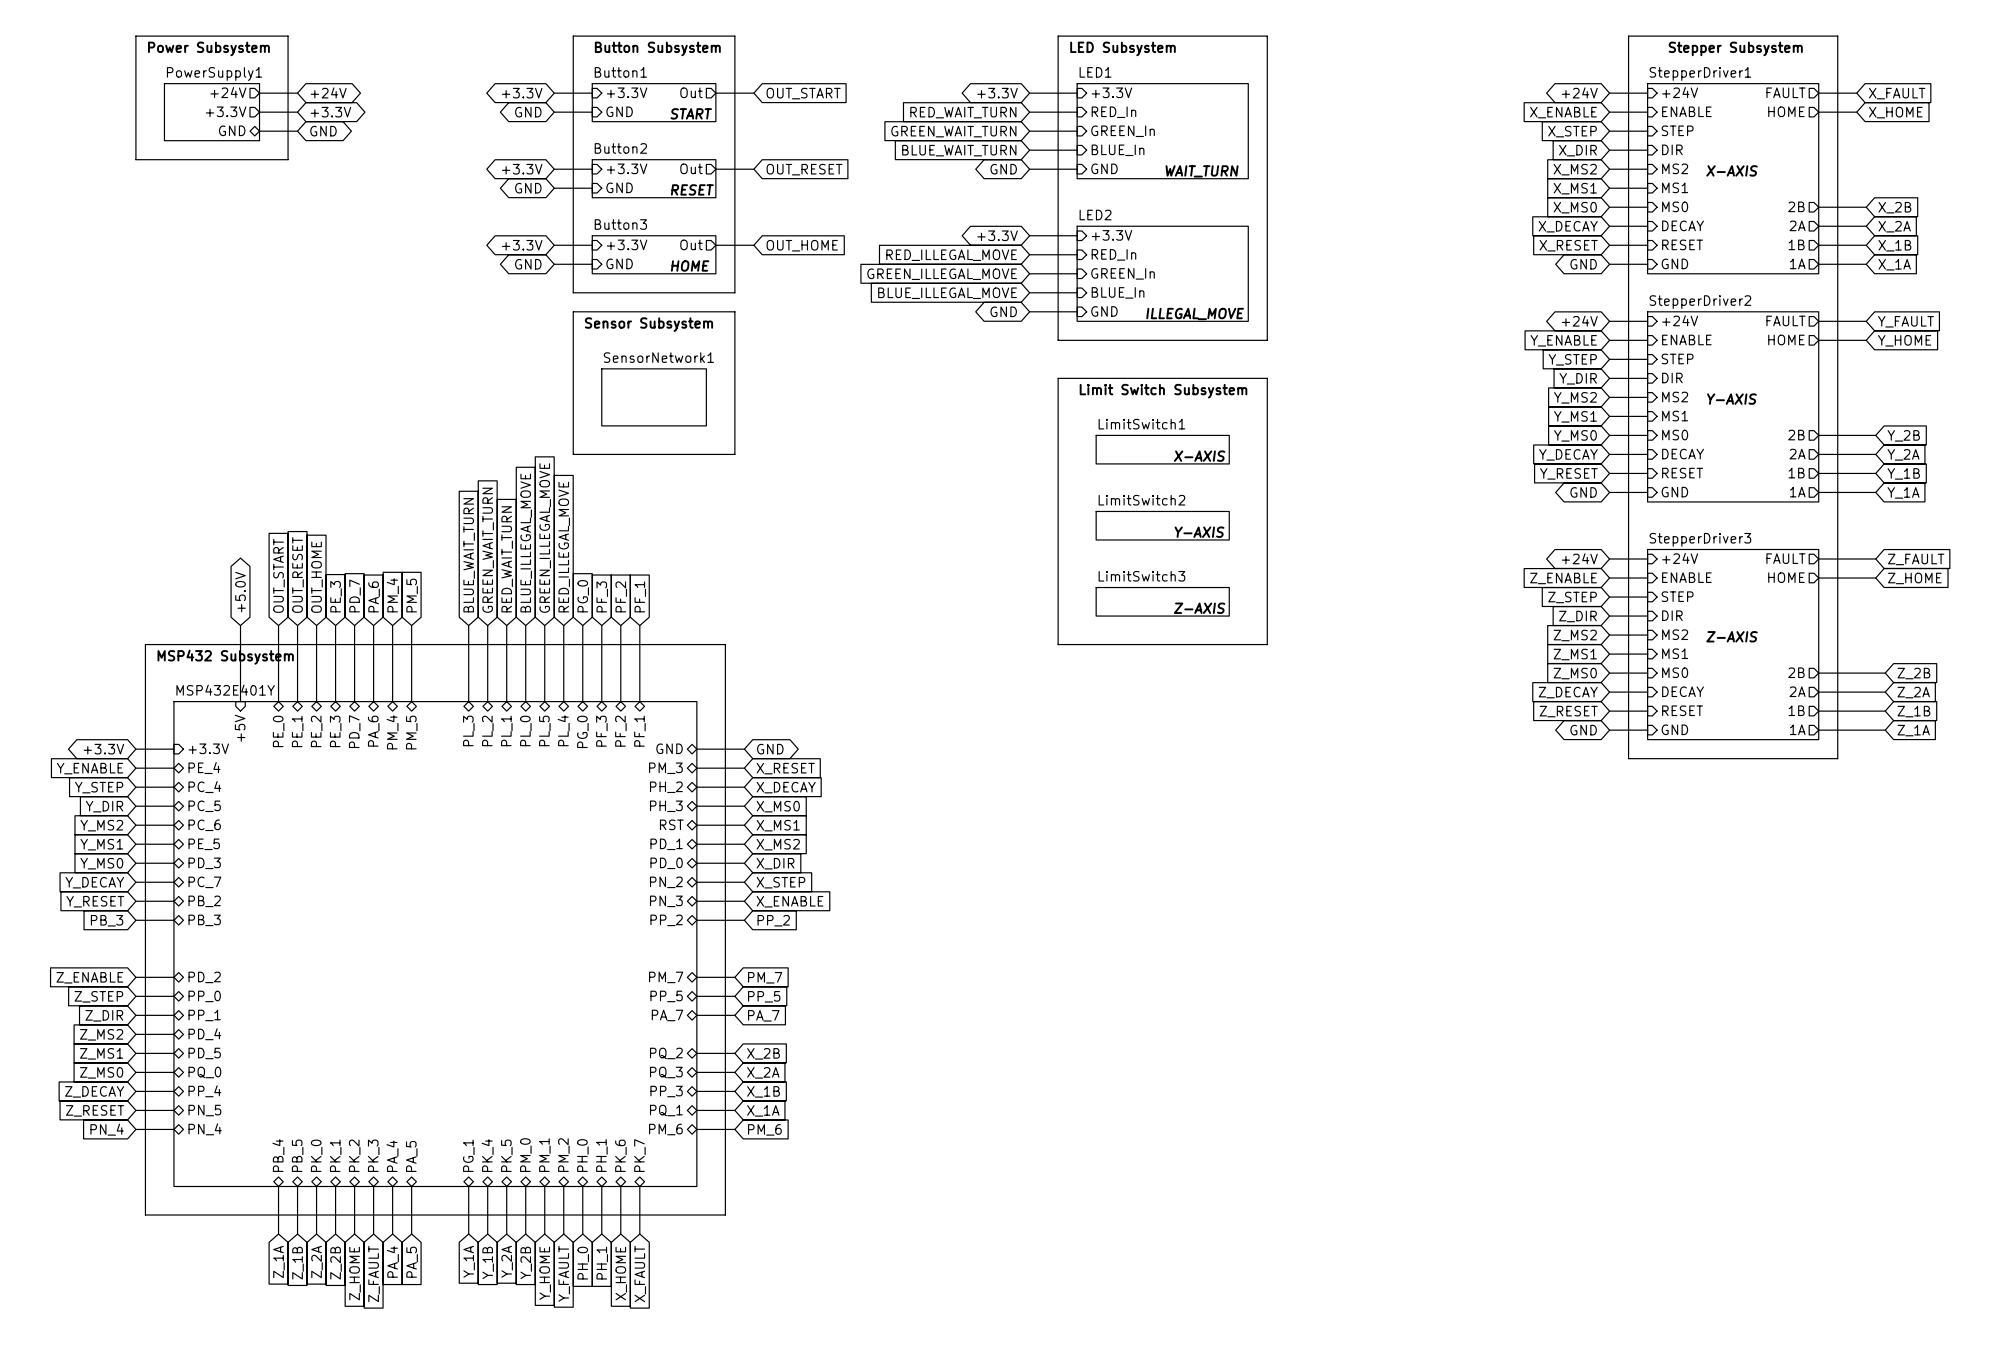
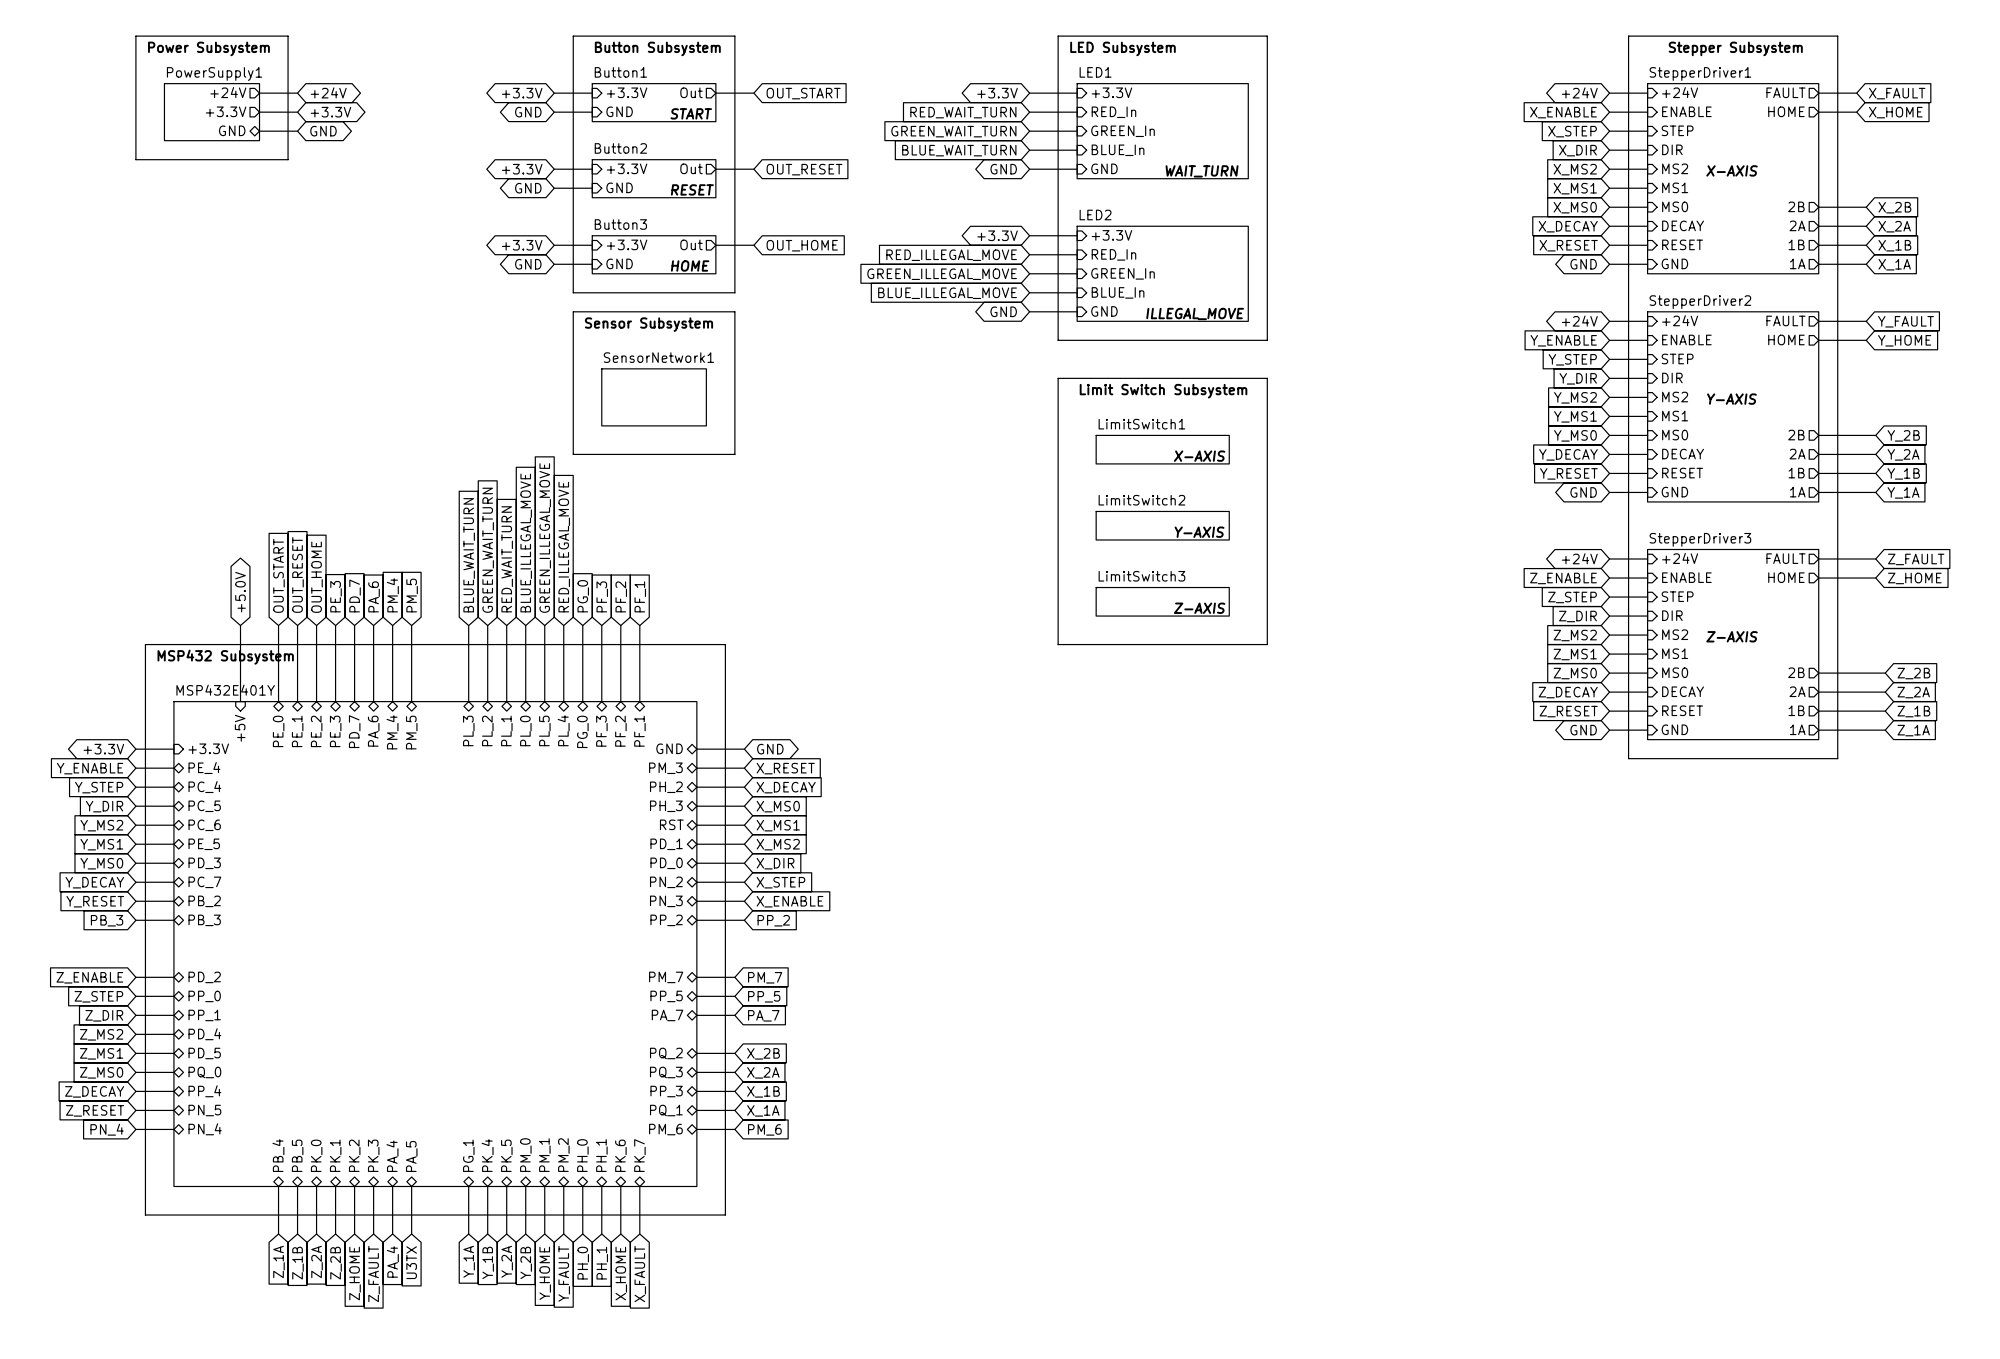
global label: PA_5 (412, 1262) -> U3TX (411, 1262)

